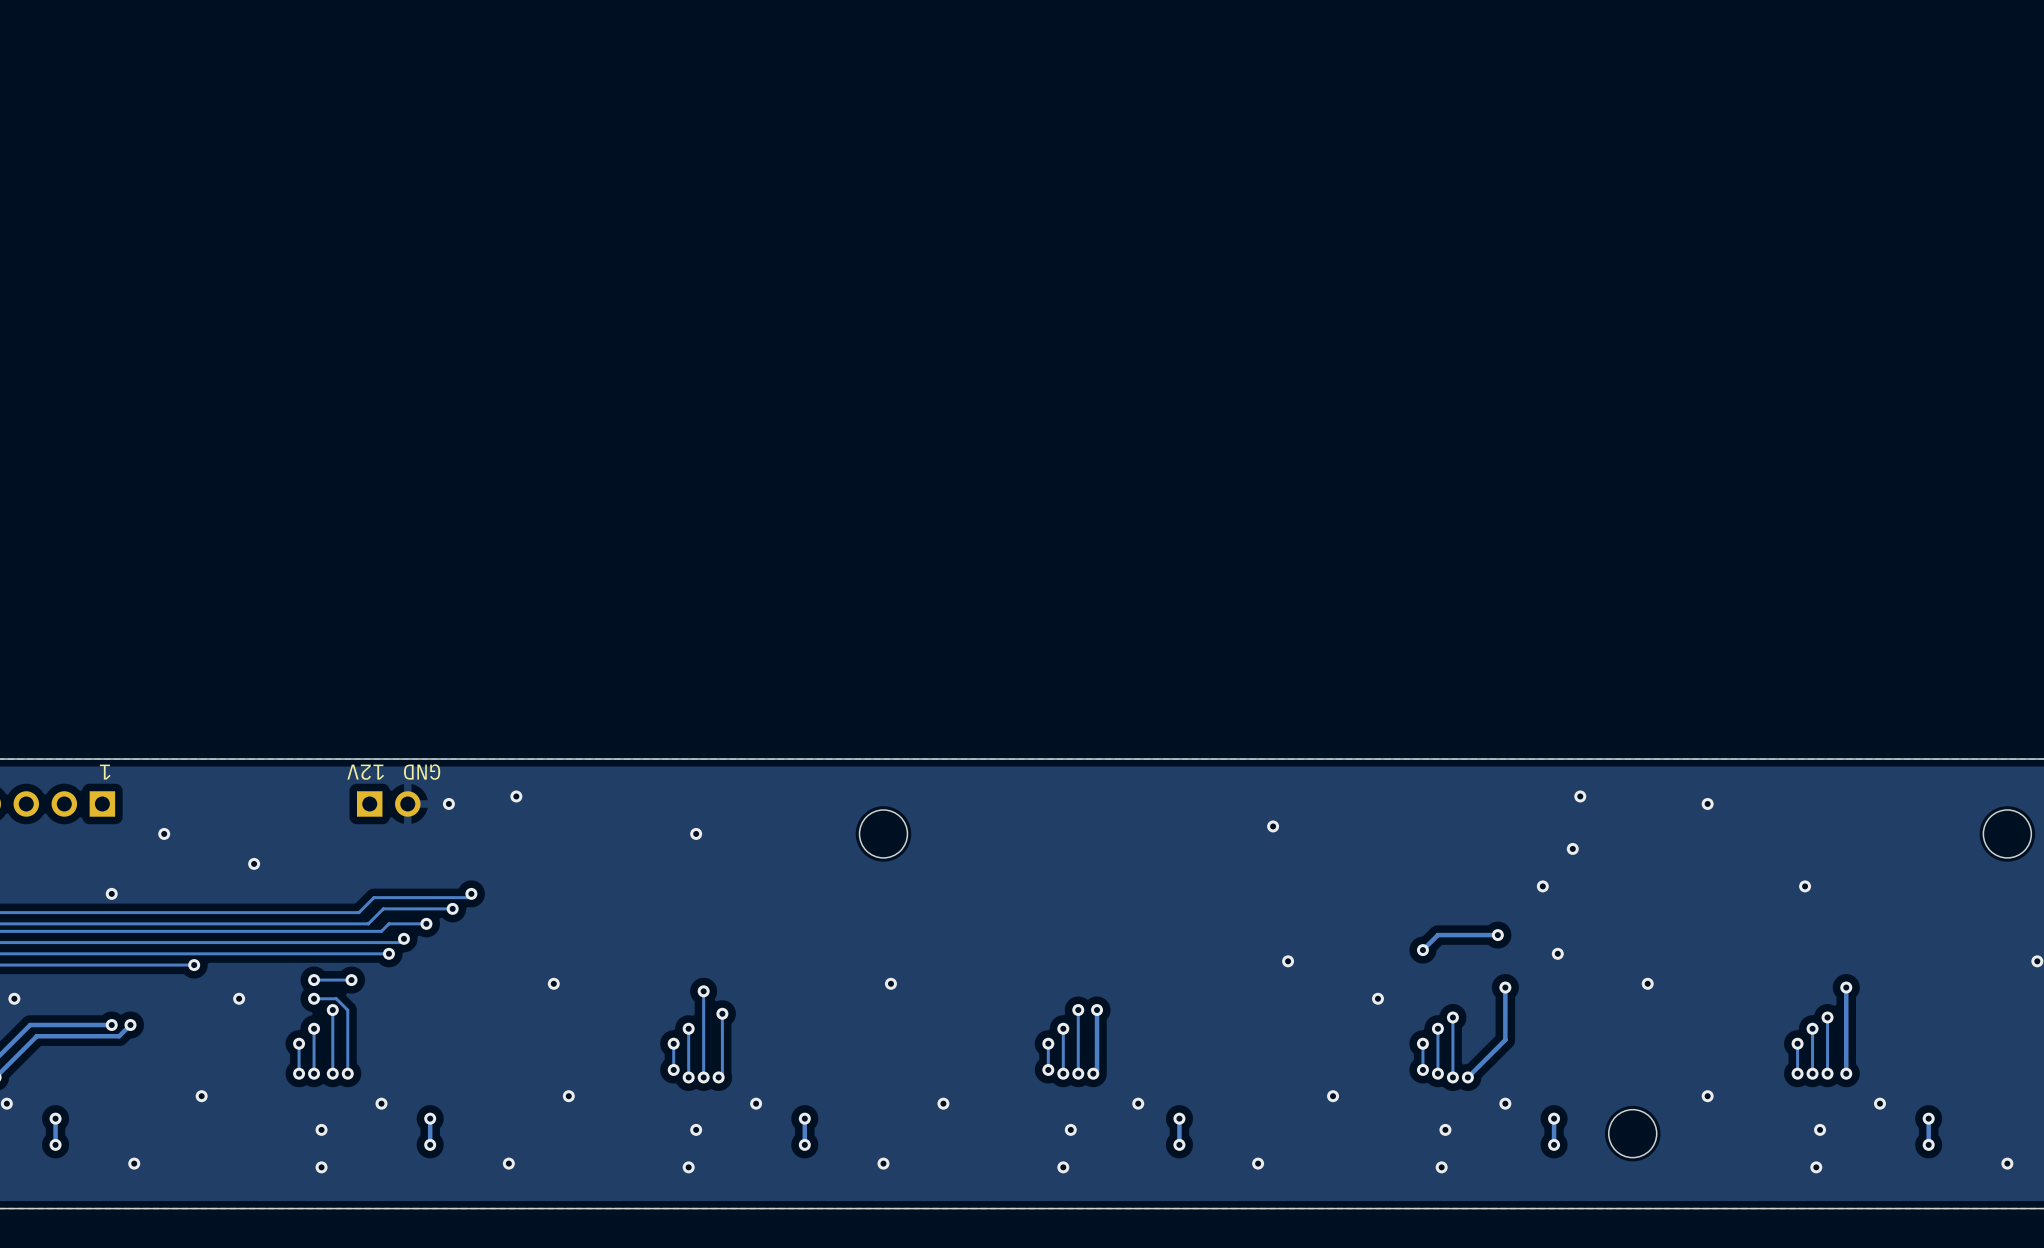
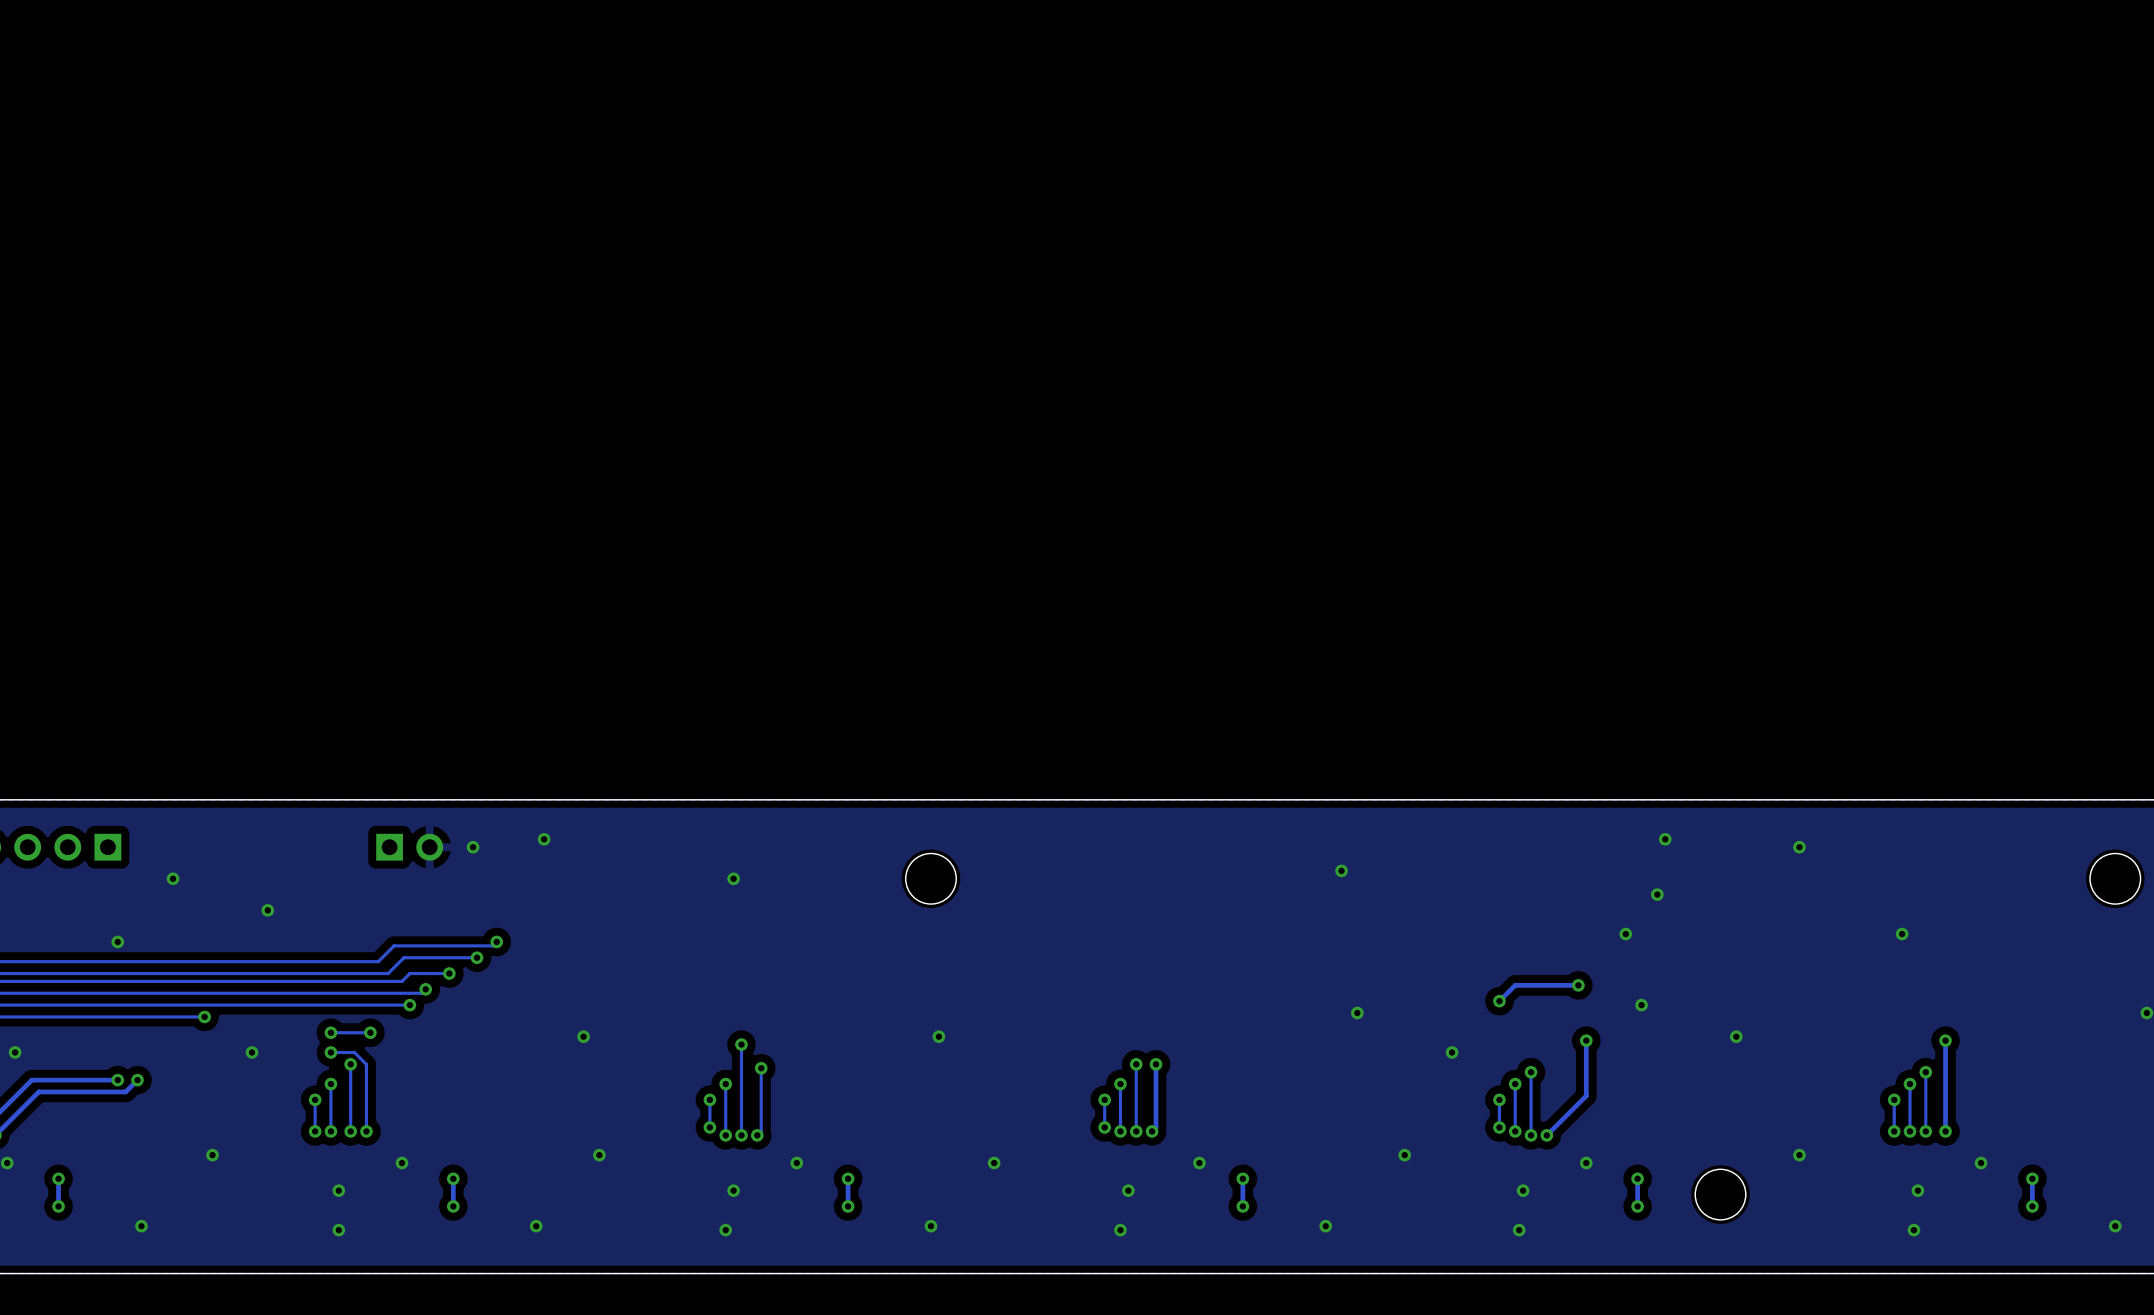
text: 1 (105, 772) -> none
text: 12V (365, 772) -> none
text: GND (422, 772) -> none

